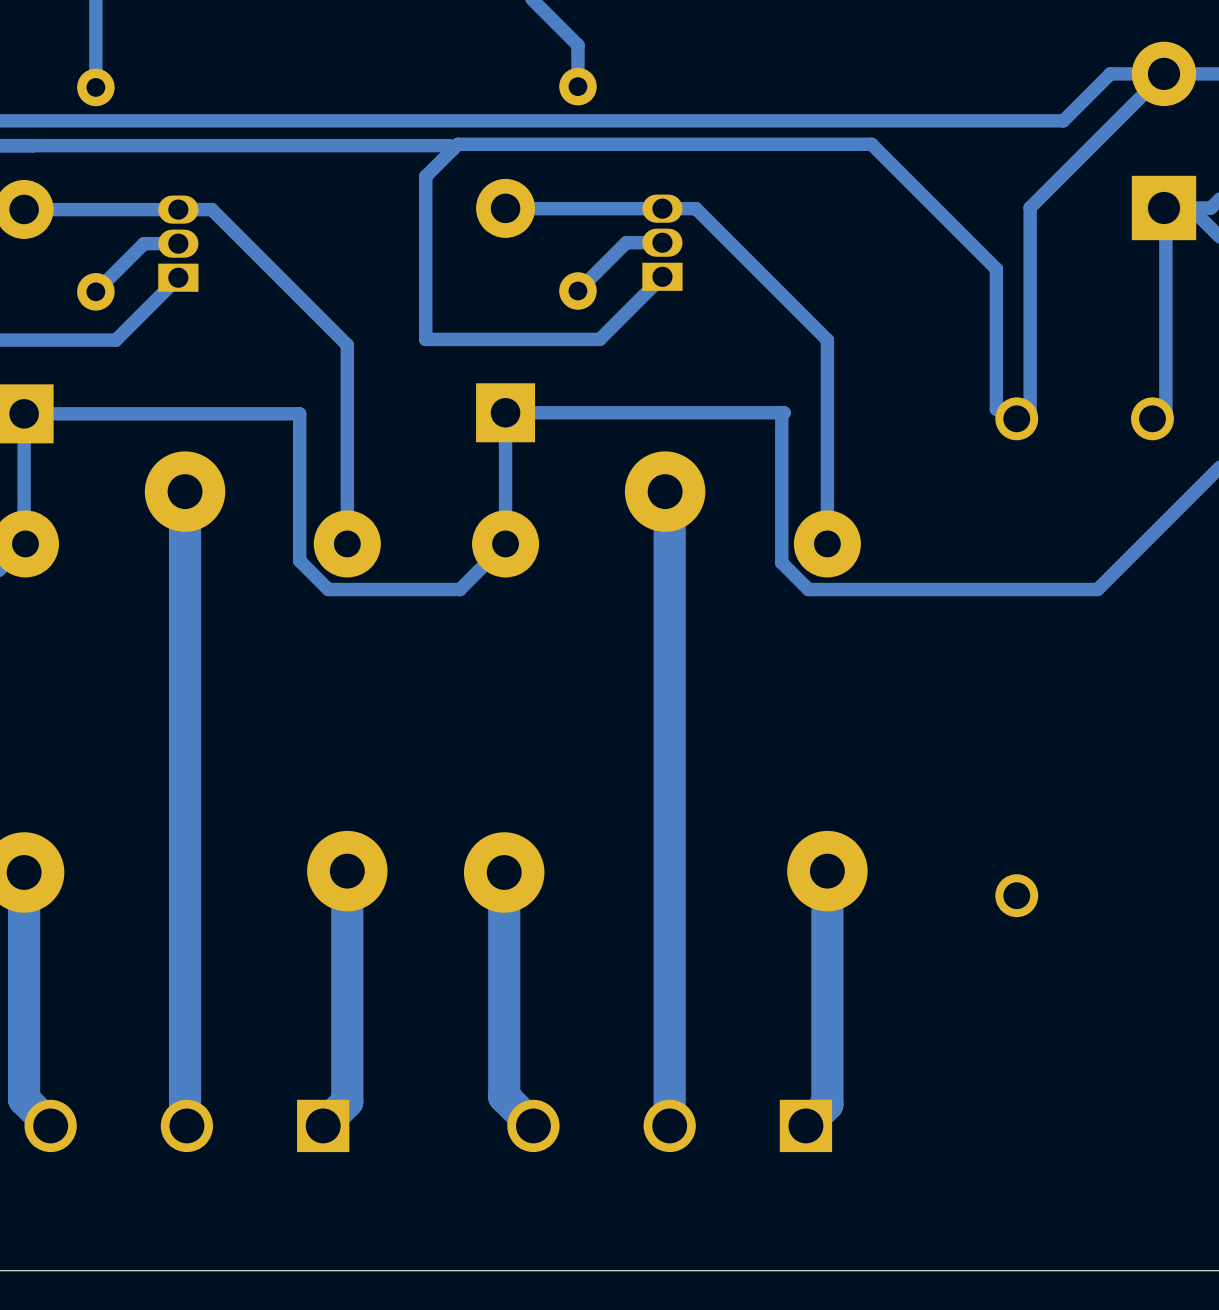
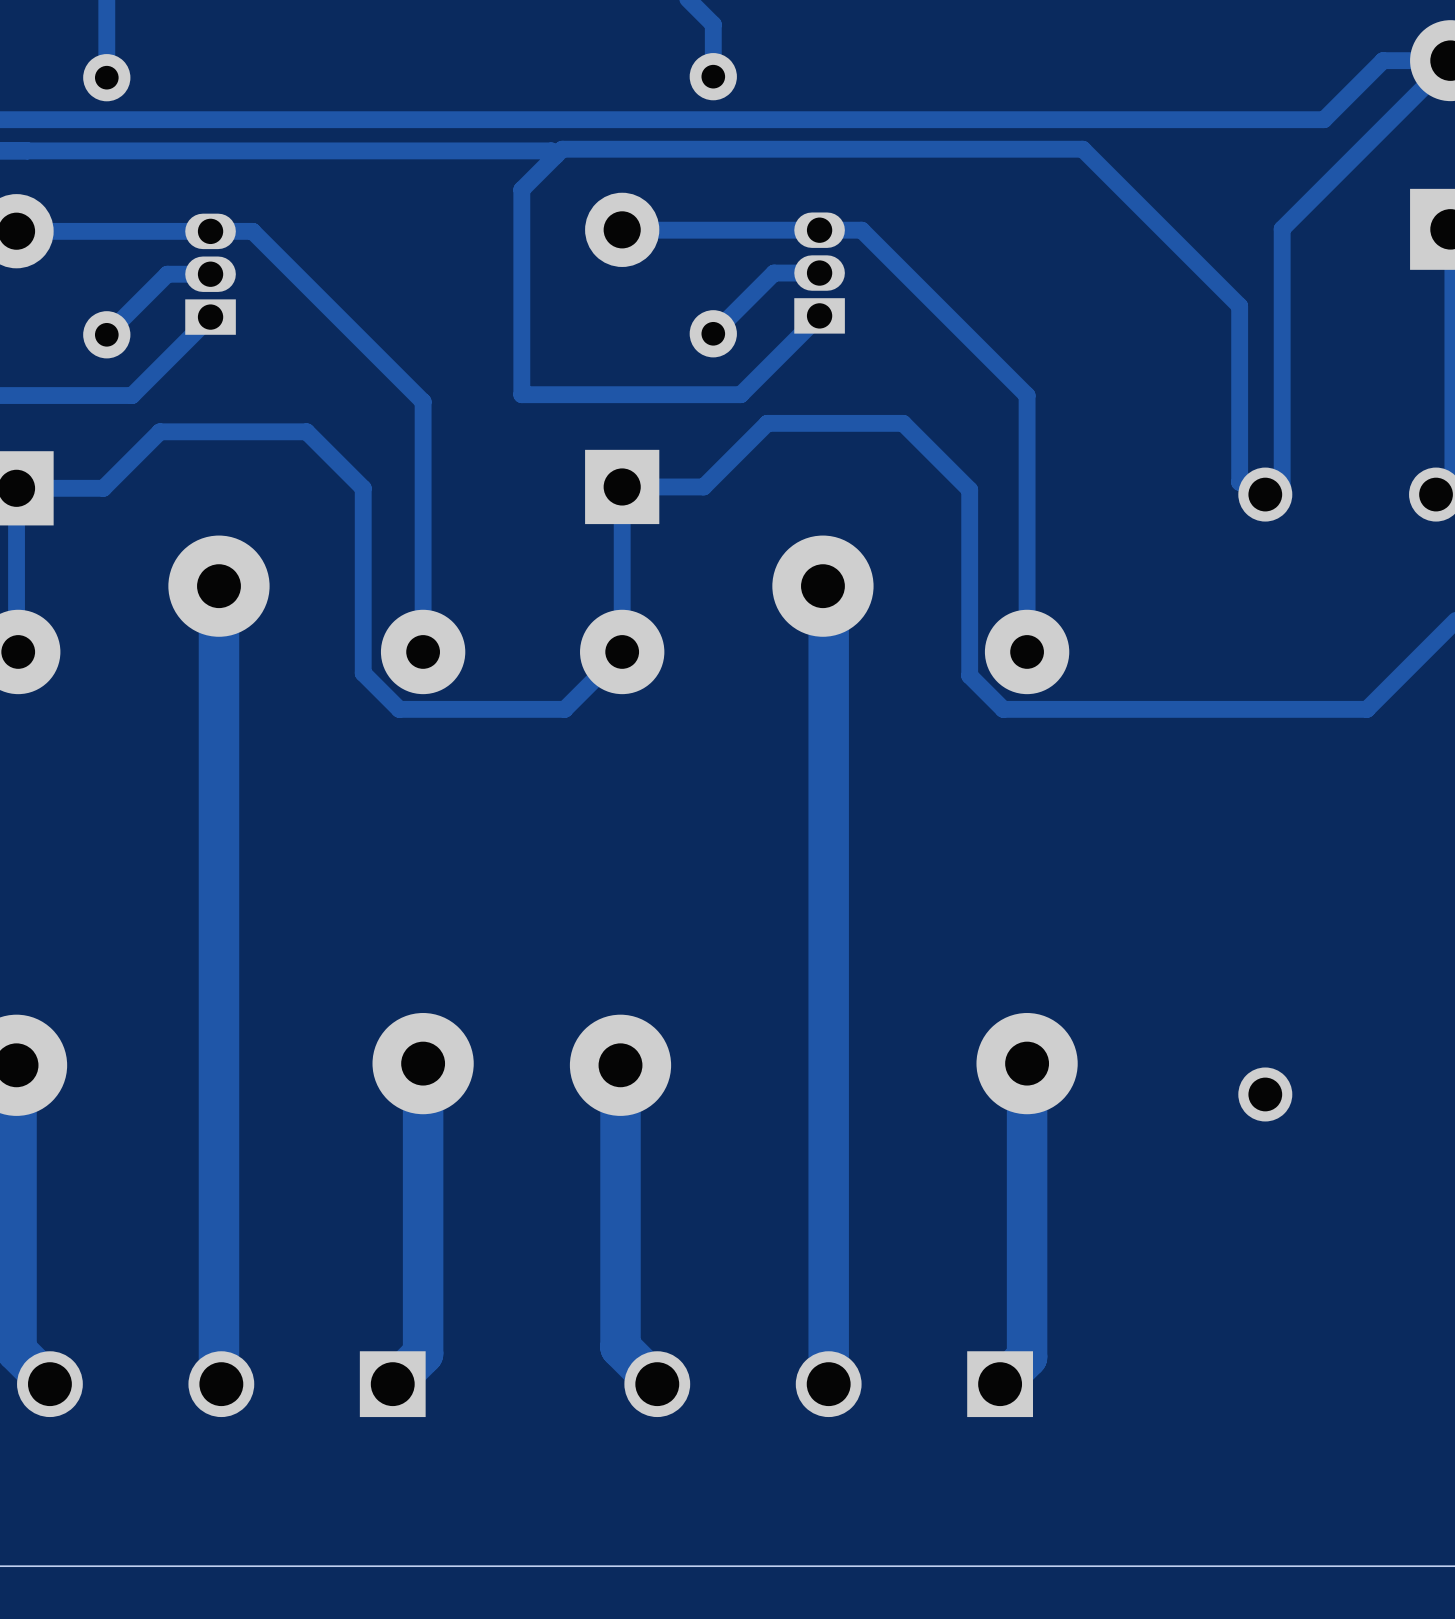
track: (570, 412) (784, 412) (781, 415) -> (703, 486) (767, 423) (903, 423) (969, 489)
track: (299, 413) (93, 413) -> (363, 488) (306, 431) (159, 431) (103, 488)

